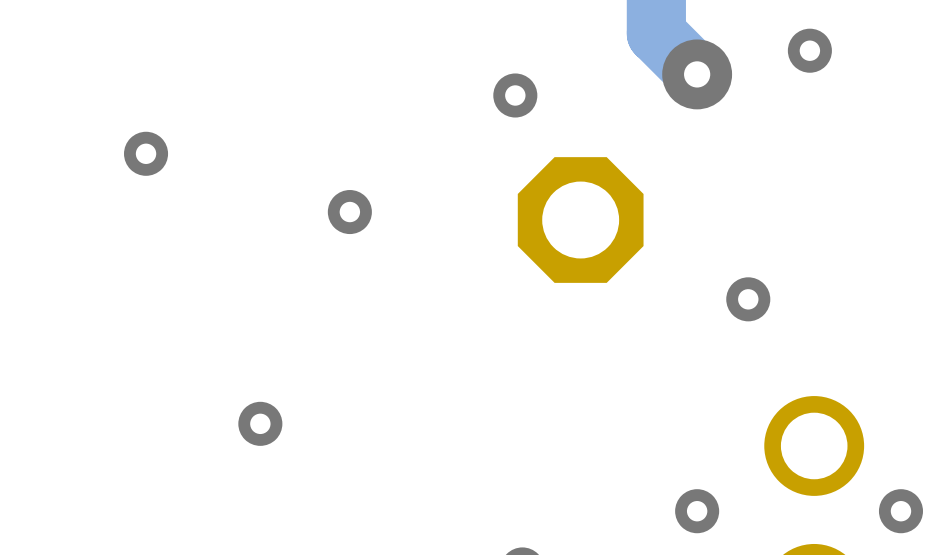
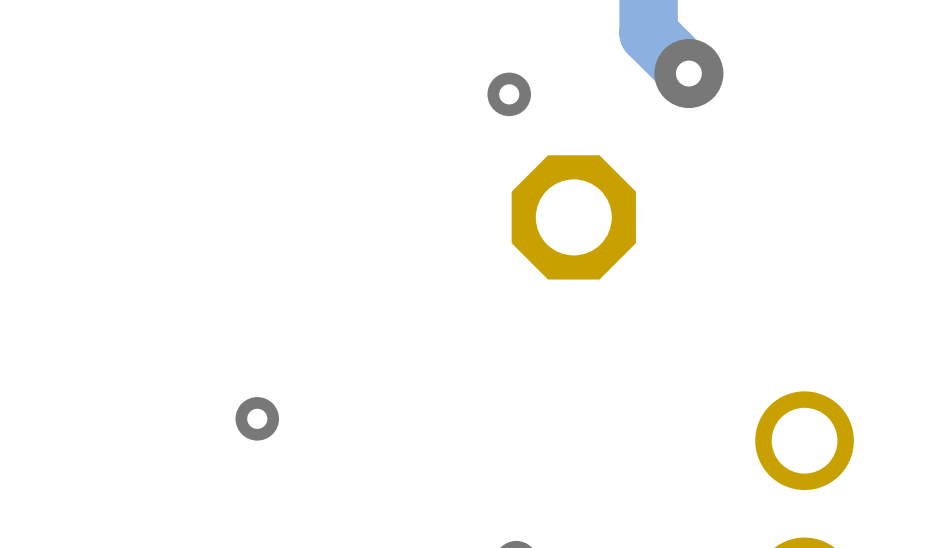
via: (809, 50) -> none
via: (146, 153) -> none
via: (349, 212) -> none
via: (748, 299) -> none
via: (697, 511) -> none
via: (900, 511) -> none

